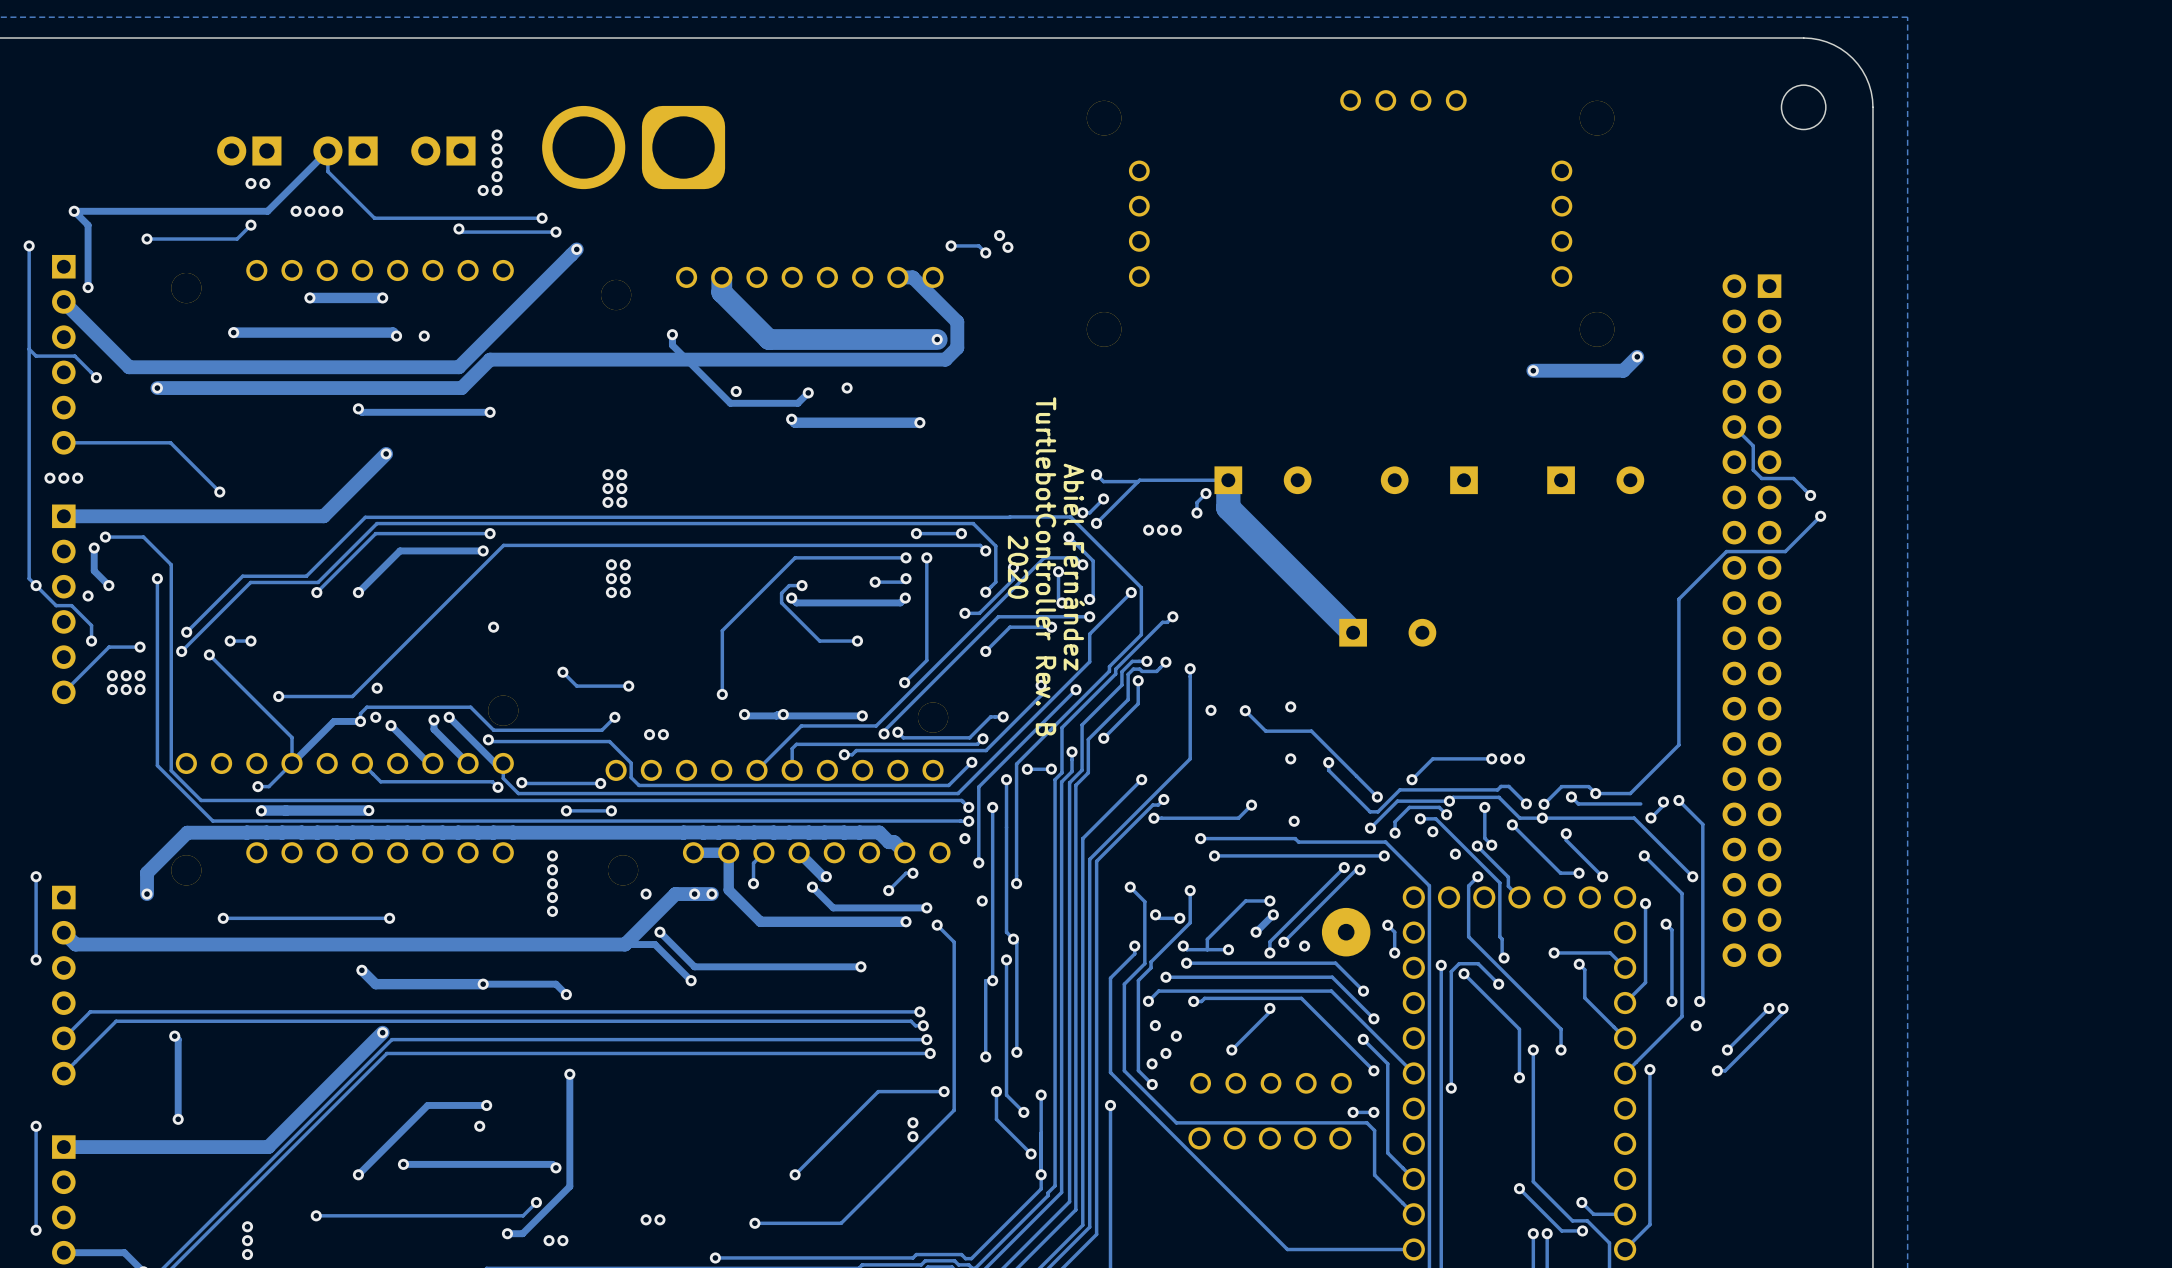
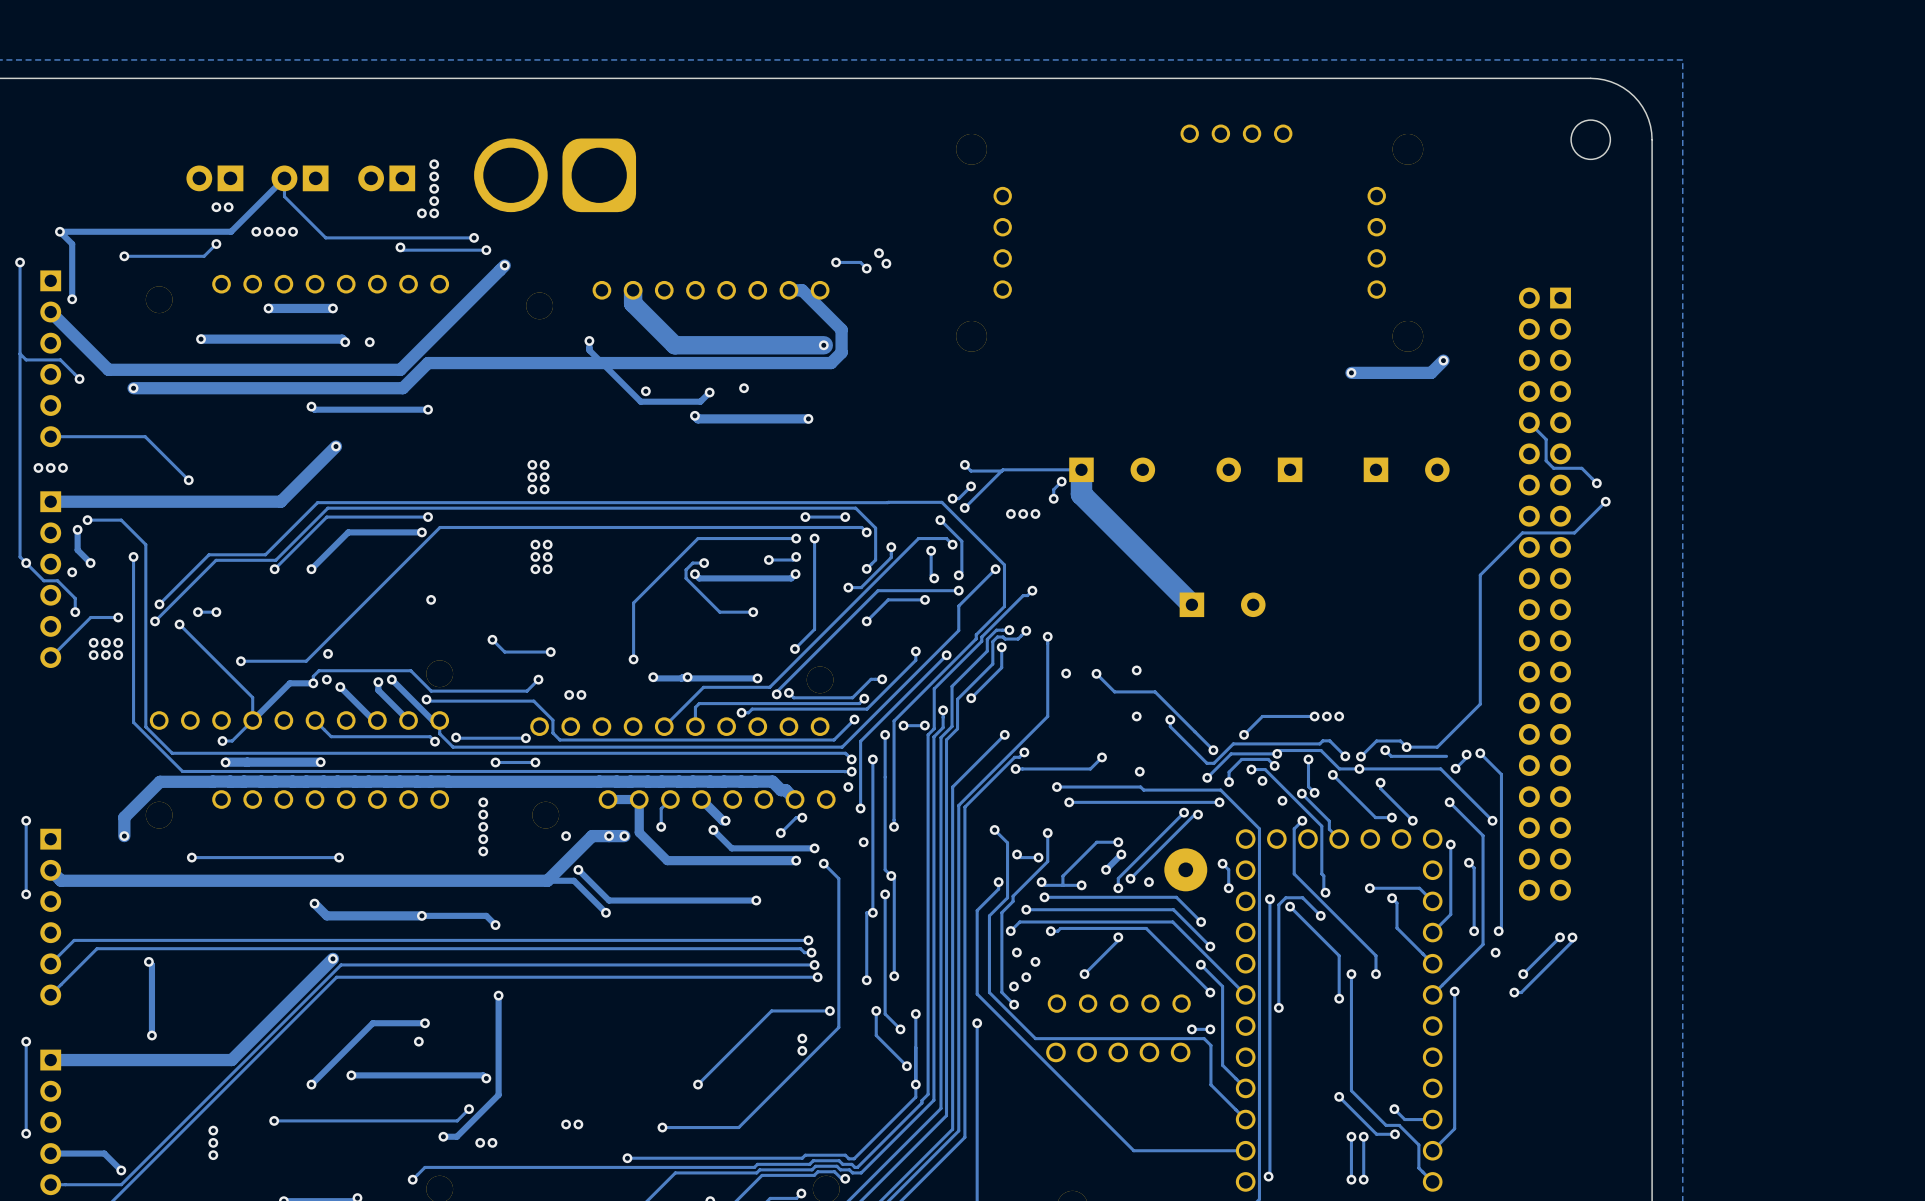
text: TurtlebotController Rev. B (1045, 566) -> none
text: 2020 (1018, 567) -> none
text: Abiel Fernández (1074, 567) -> none

